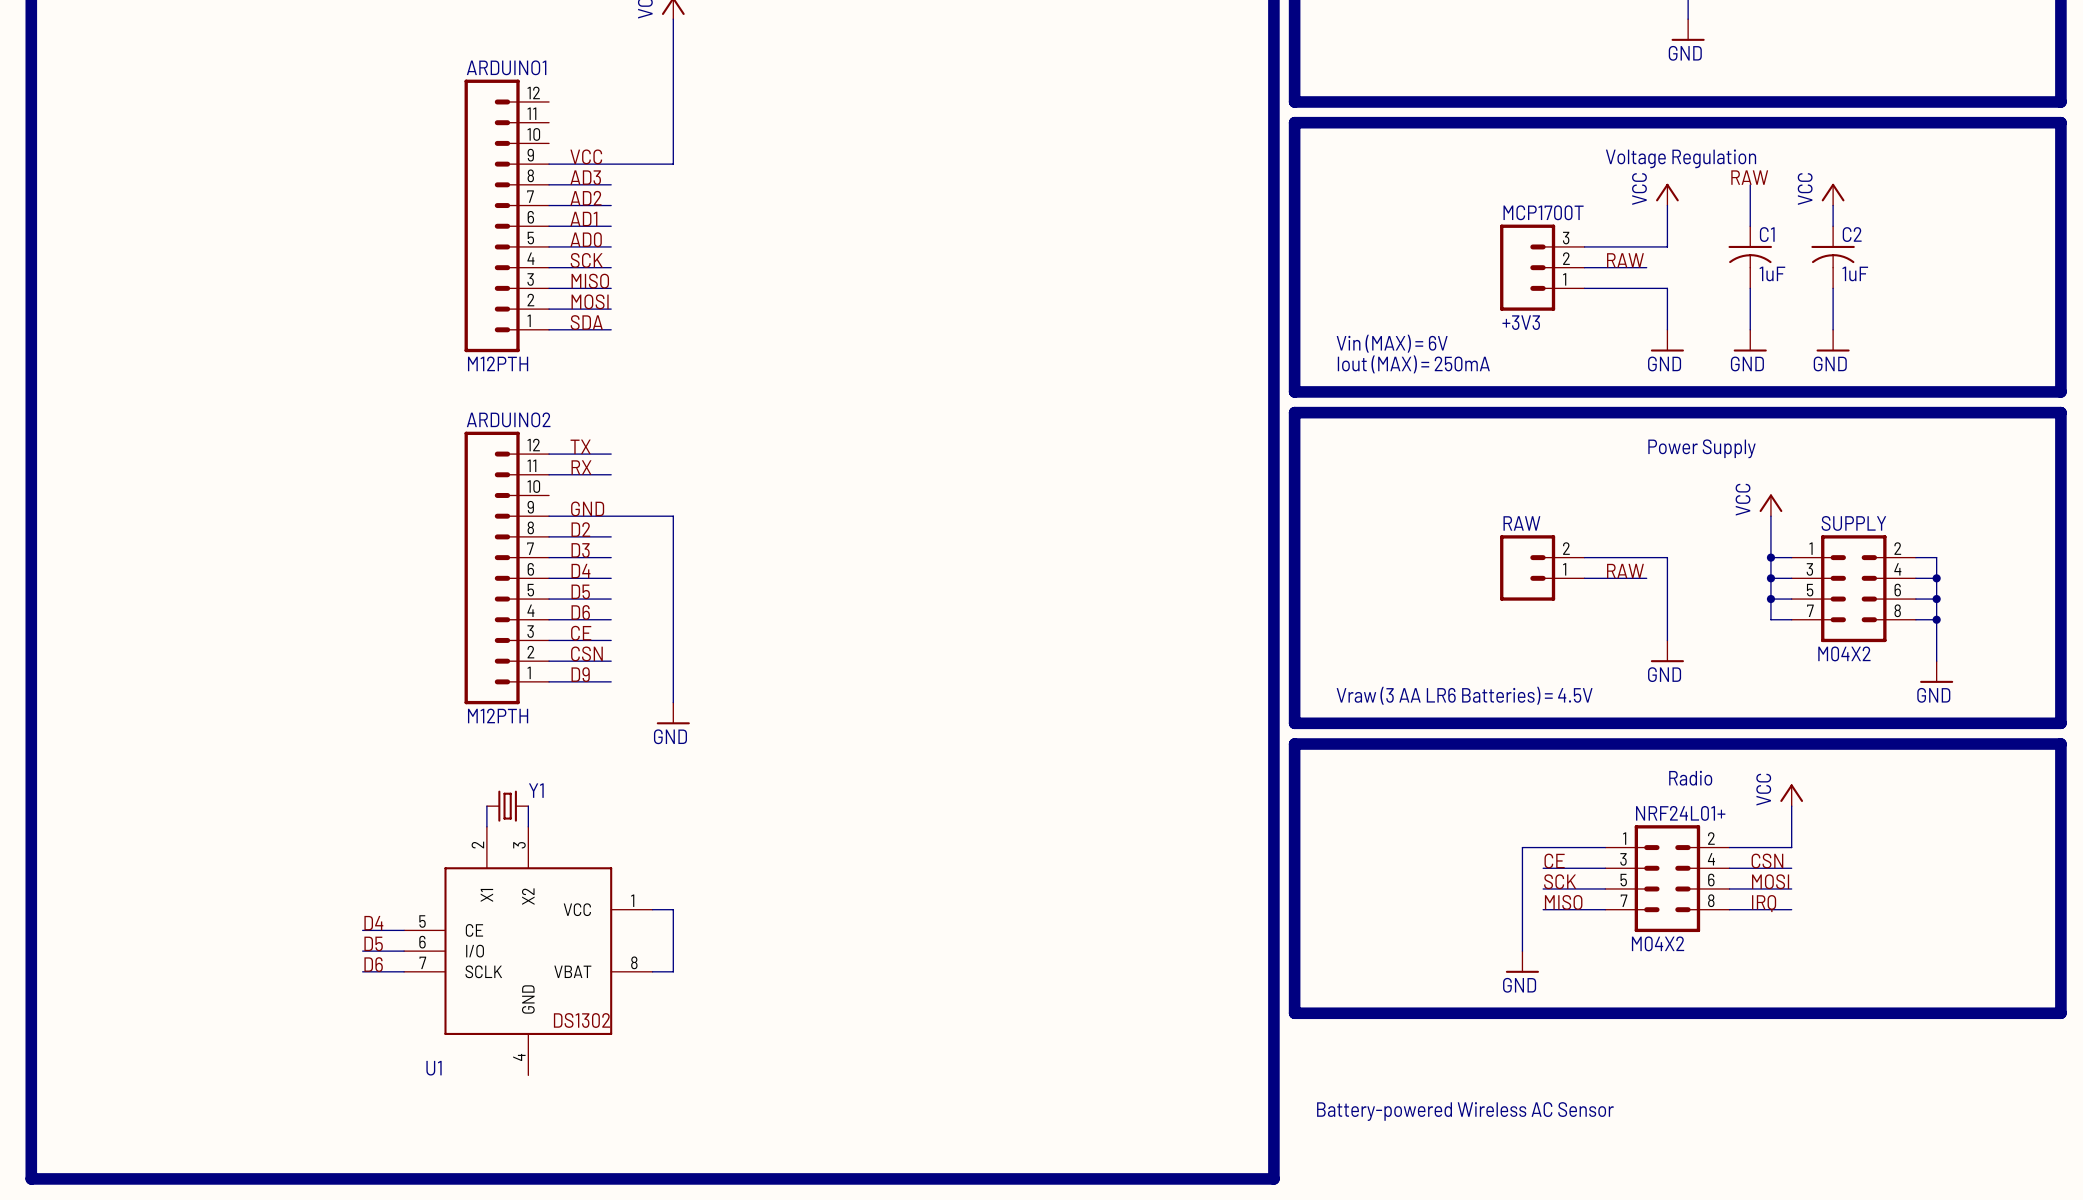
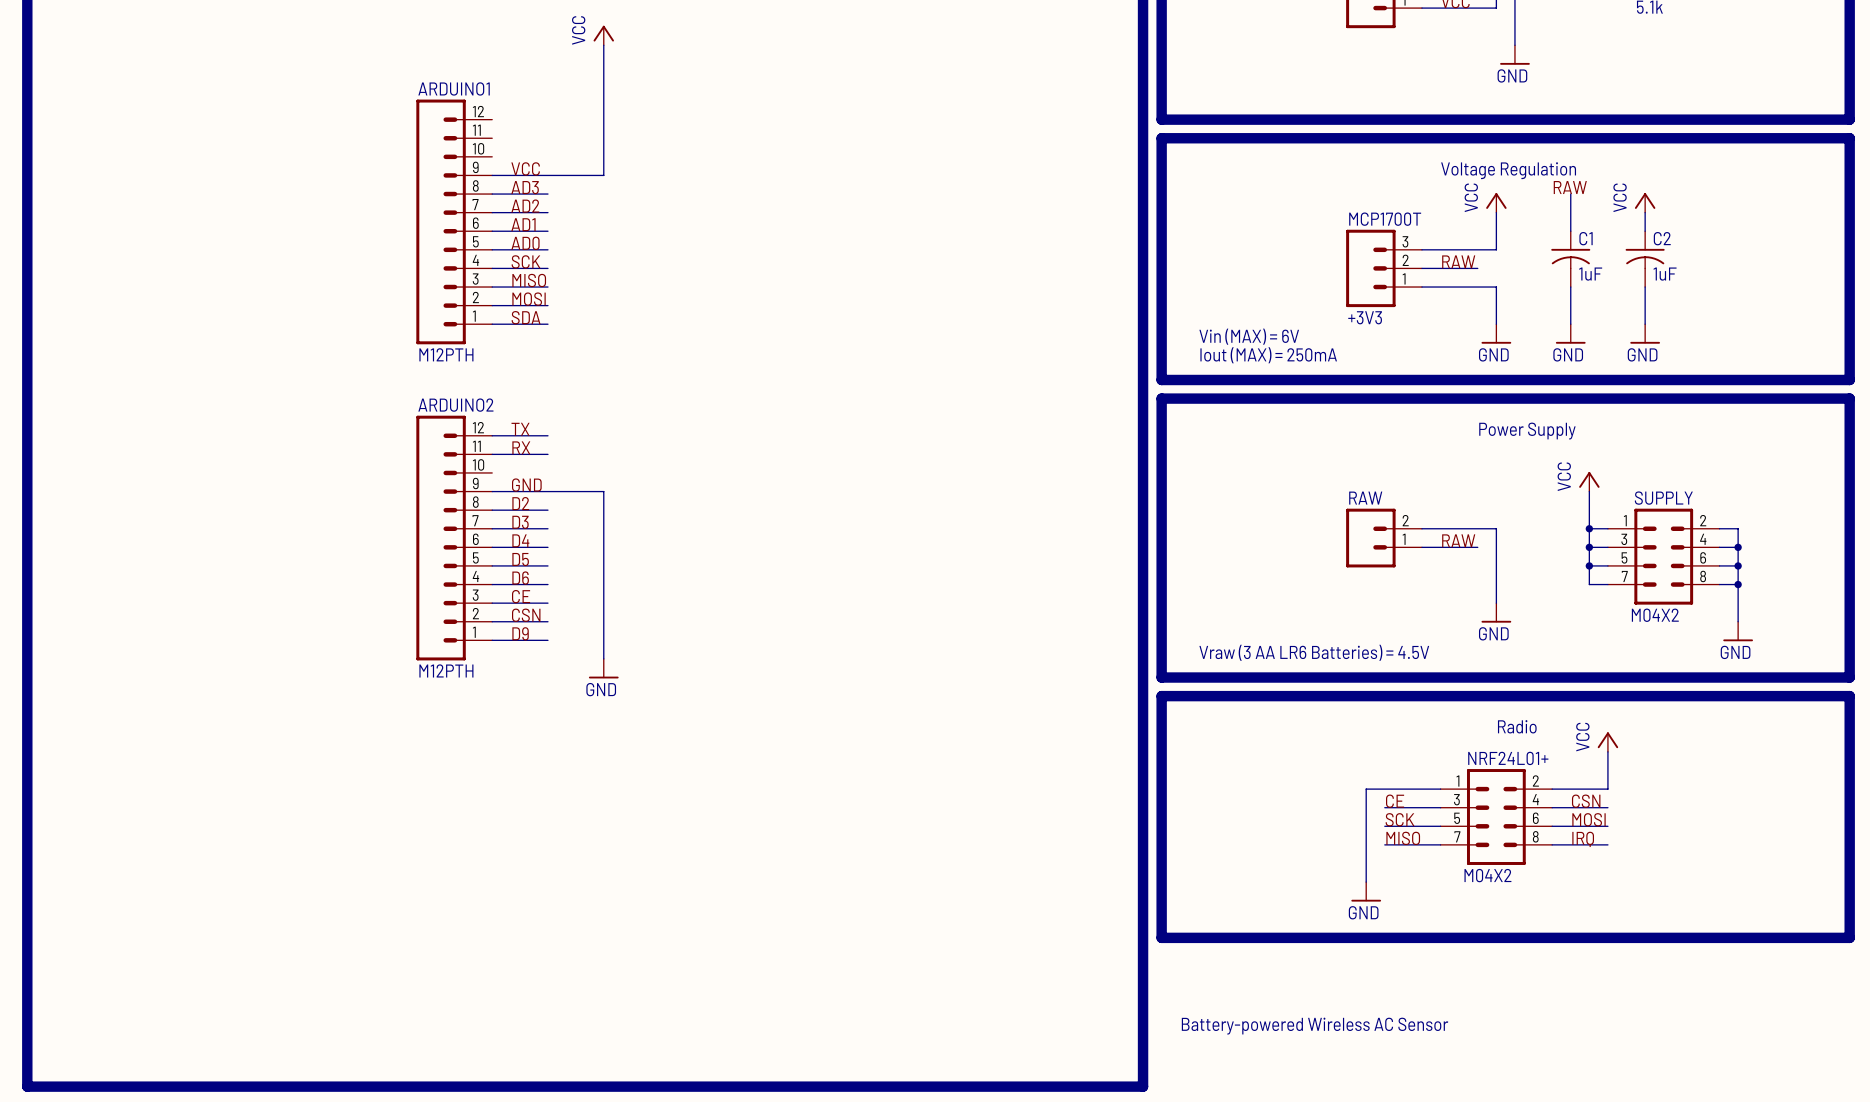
wire: (486, 806) (486, 826) -> none
Y1: (507, 806) -> none
wire: (528, 806) (528, 826) -> none
wire: (652, 909) (673, 909) (673, 971) (652, 971) -> none
label: D4 (373, 923) -> none
wire: (362, 930) (404, 930) -> none
label: D5 (373, 943) -> none
wire: (362, 951) (404, 951) -> none
U1: (528, 951) -> none
label: D6 (373, 964) -> none
wire: (362, 971) (404, 971) -> none

